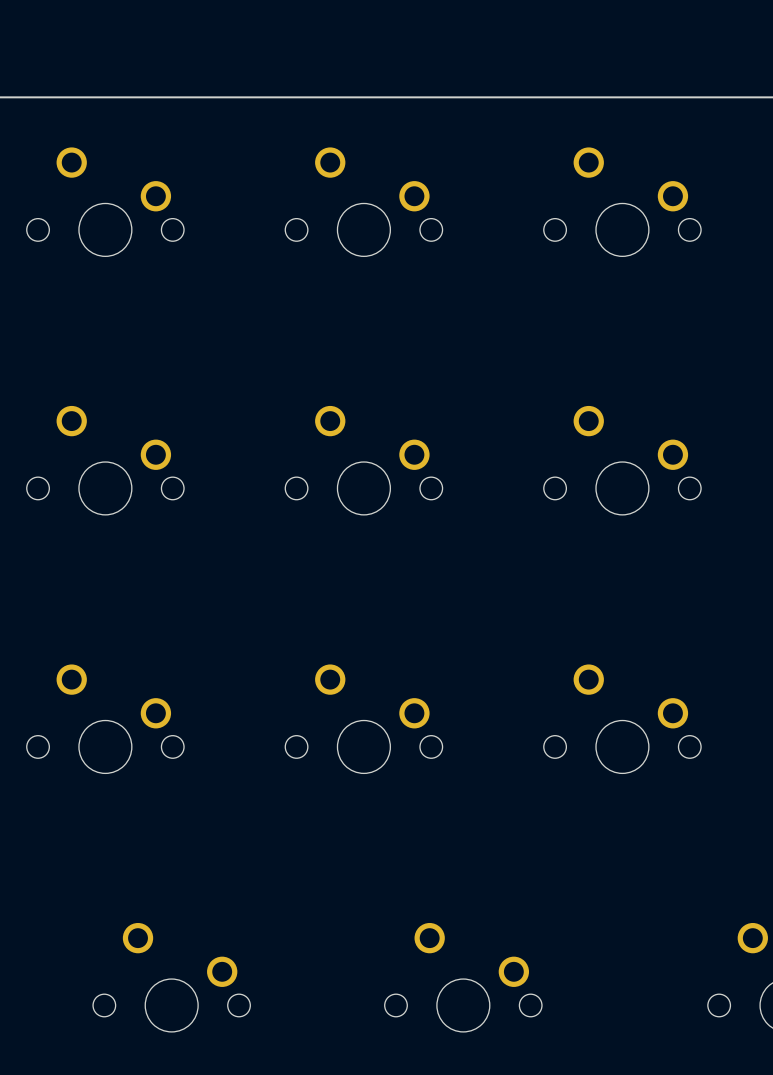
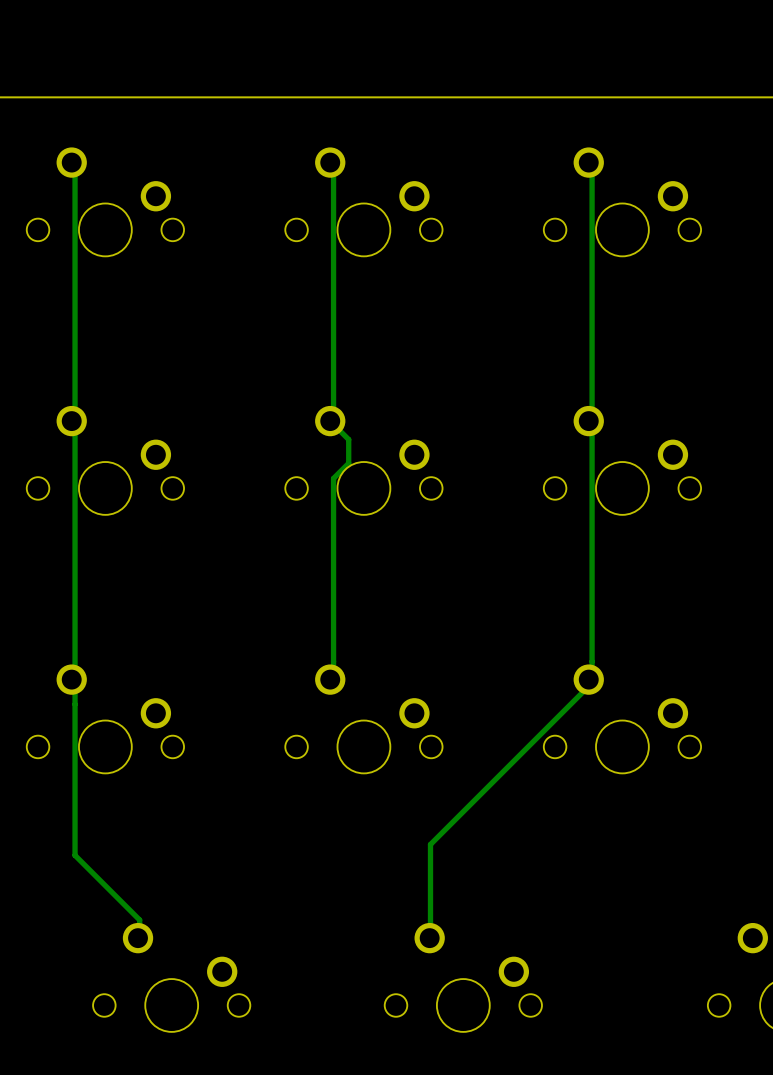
track: none -> (75, 165) (75, 855) (139, 920) (139, 941)
track: none -> (333, 165) (333, 424) (348, 439) (348, 463) (333, 478) (333, 682)
track: none -> (592, 165) (592, 682) (430, 844) (430, 941)

